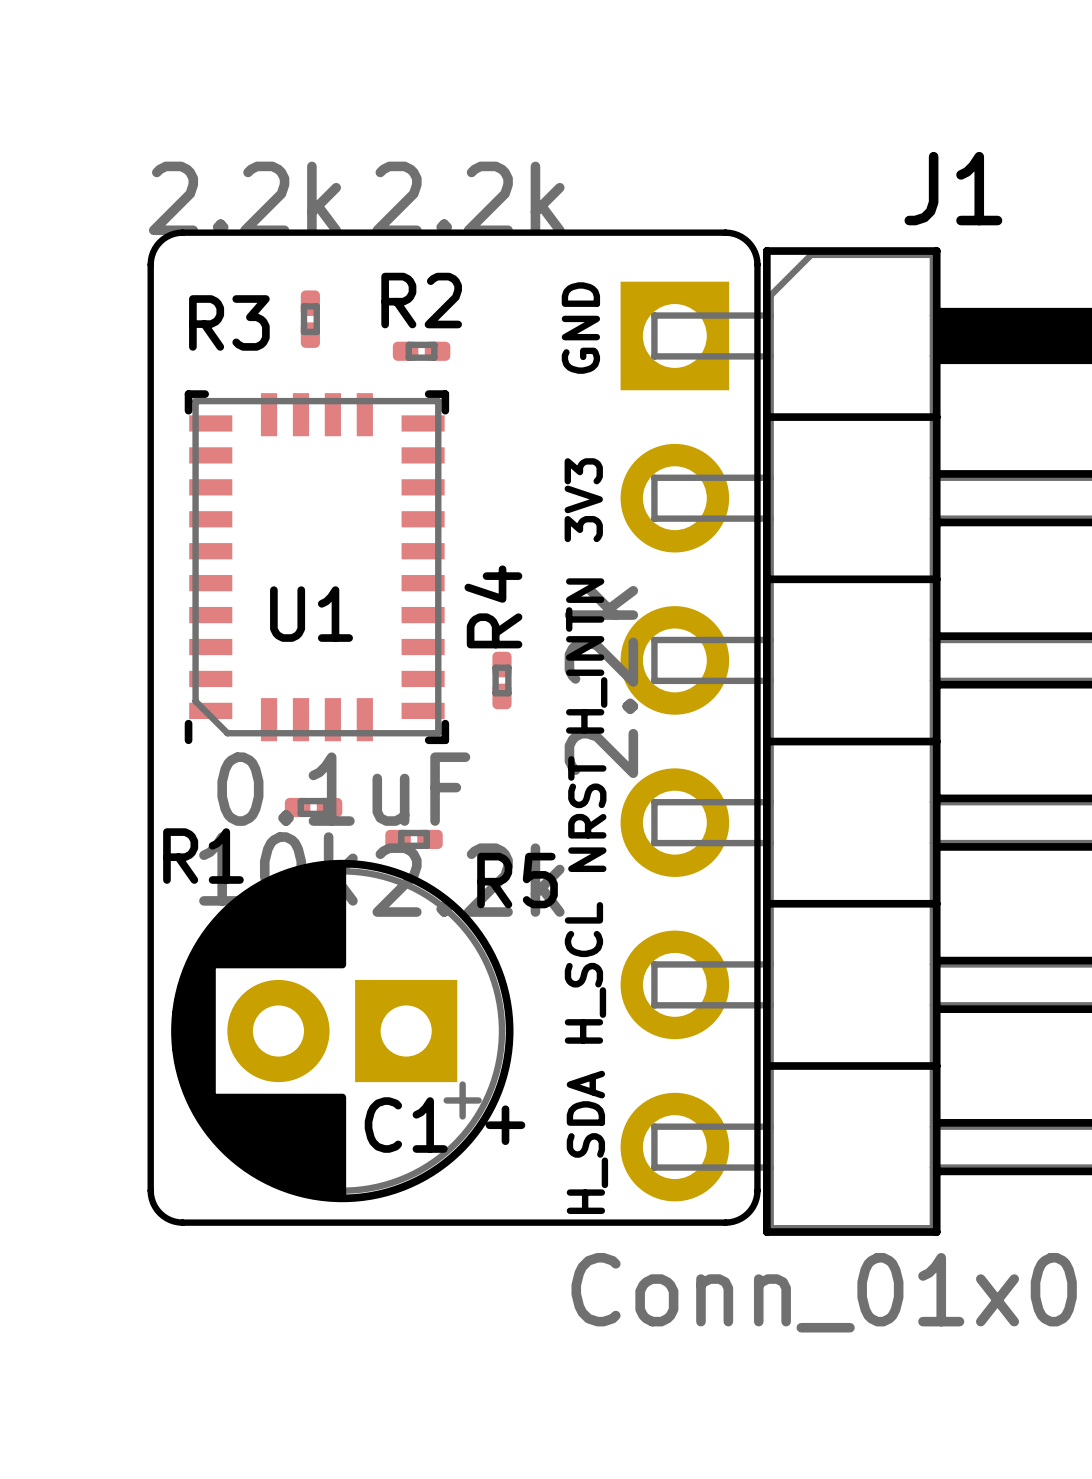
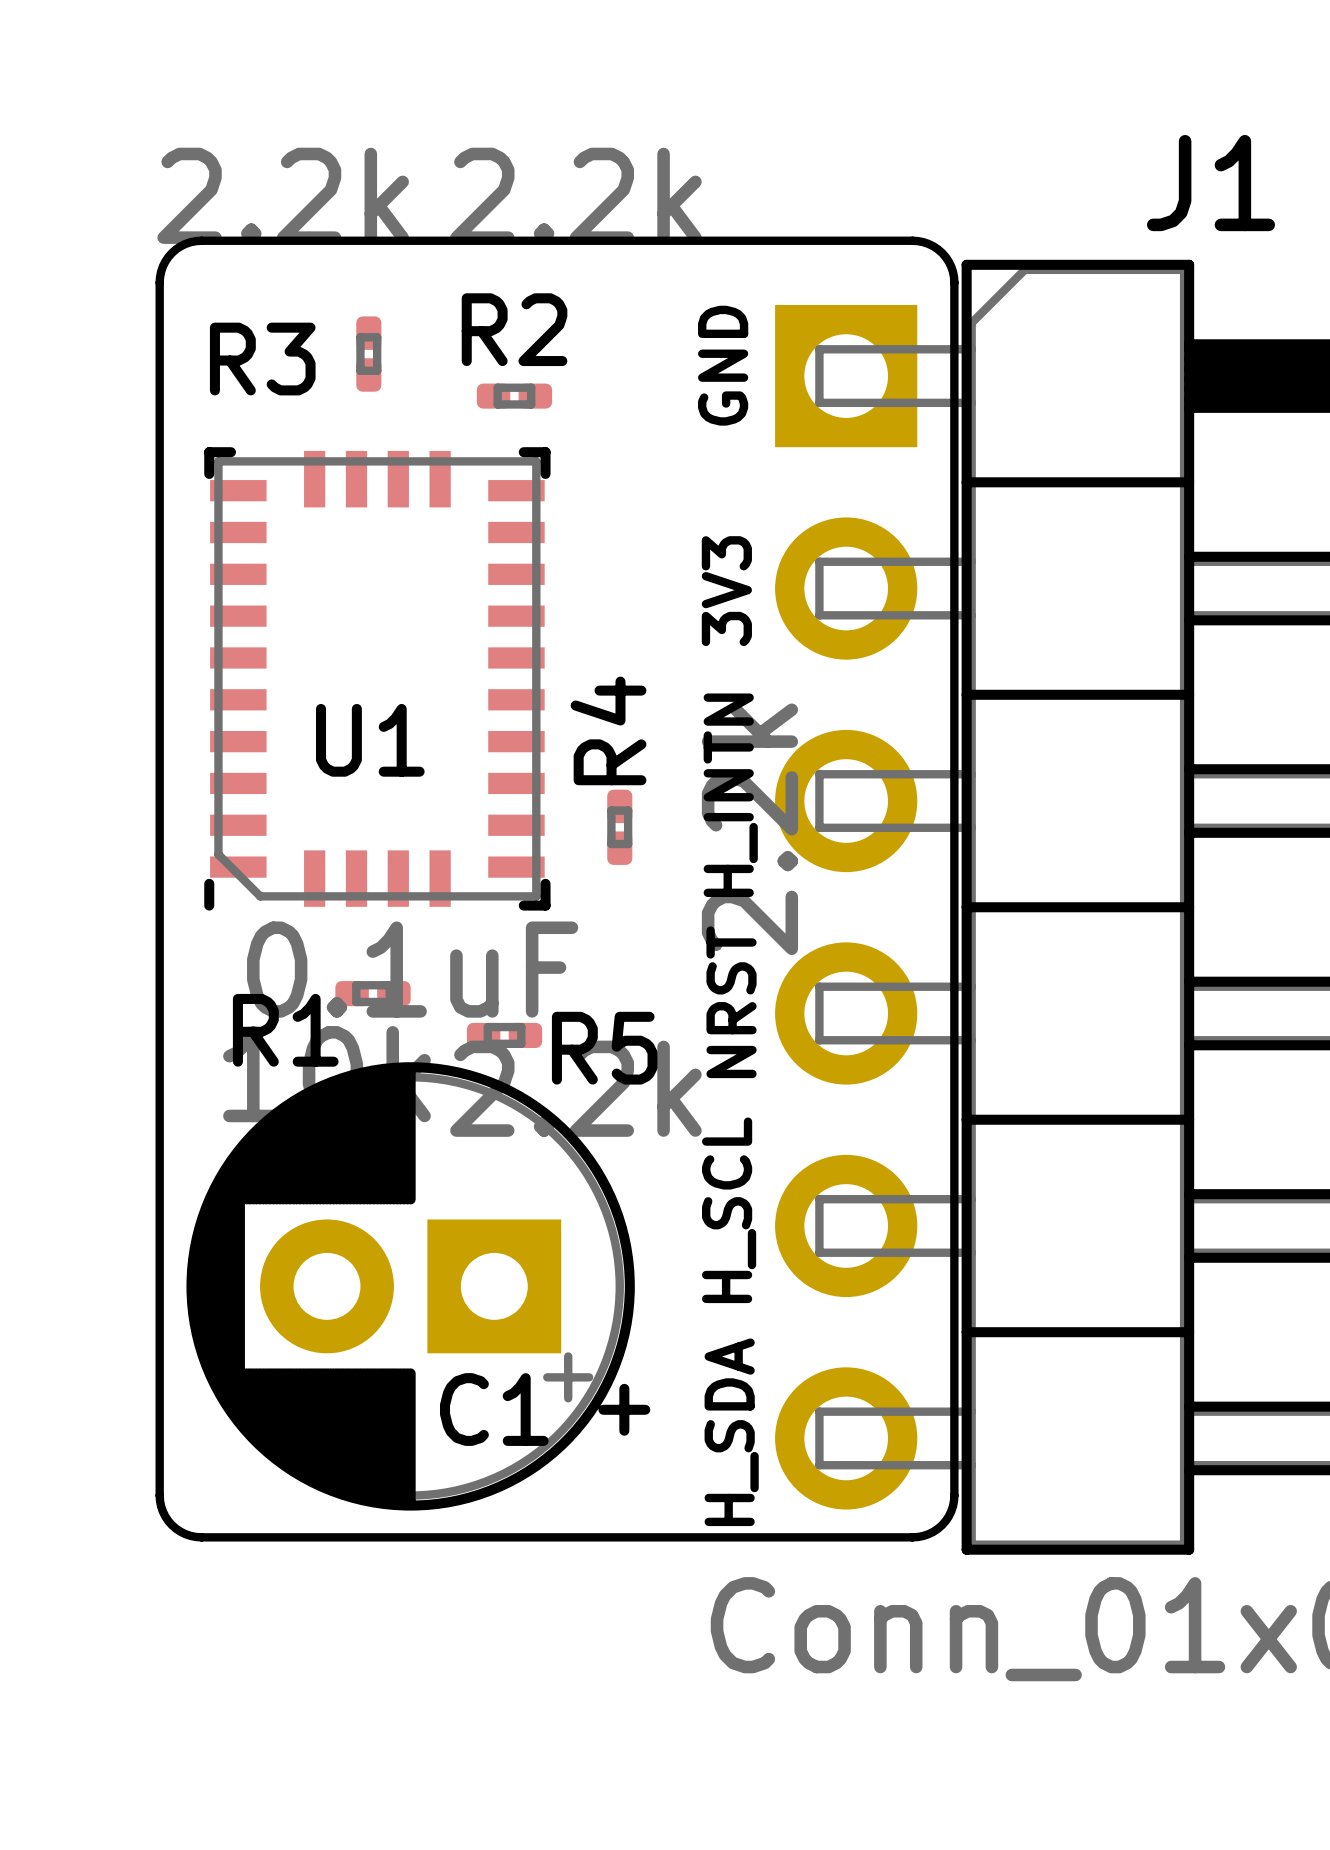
R1 name position: R1 (203, 856) -> R1 (285, 1030)
R5 name position: R5 (517, 880) -> R5 (604, 1048)

